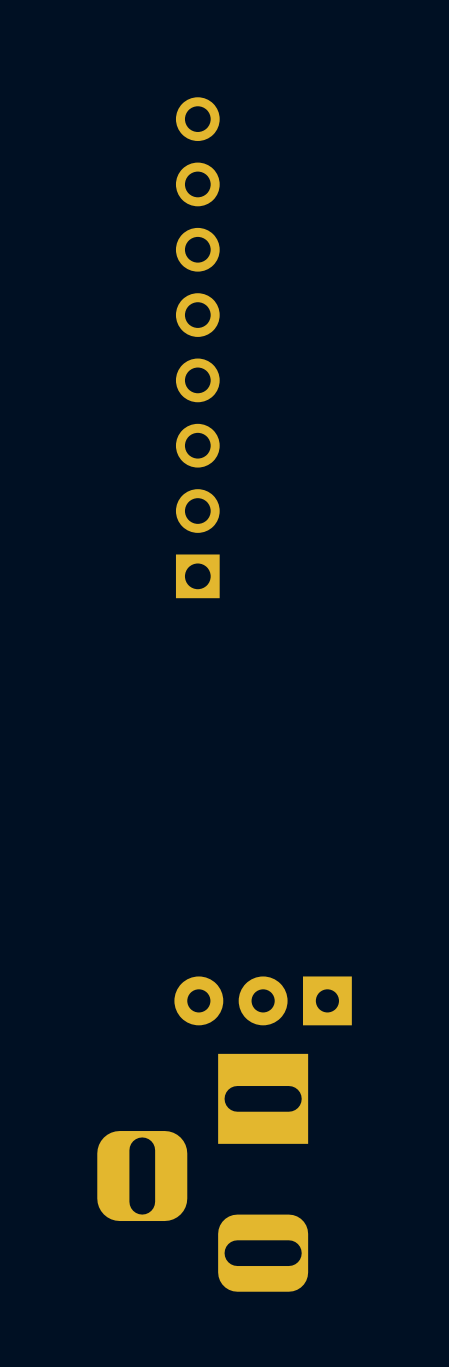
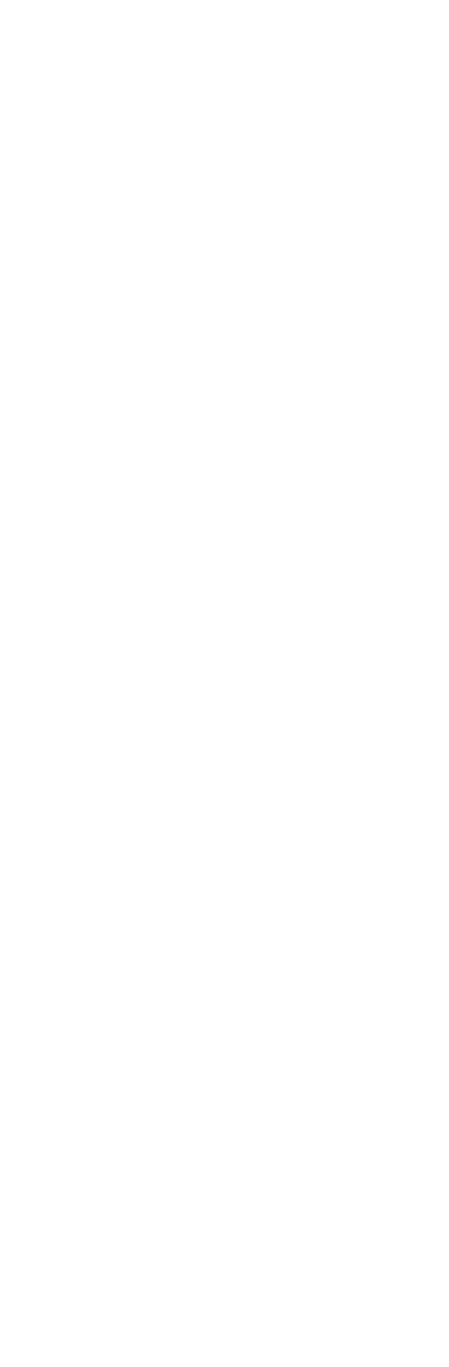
part: (197, 347) -> none
part: (263, 1000) -> none
part: (202, 1172) -> none

